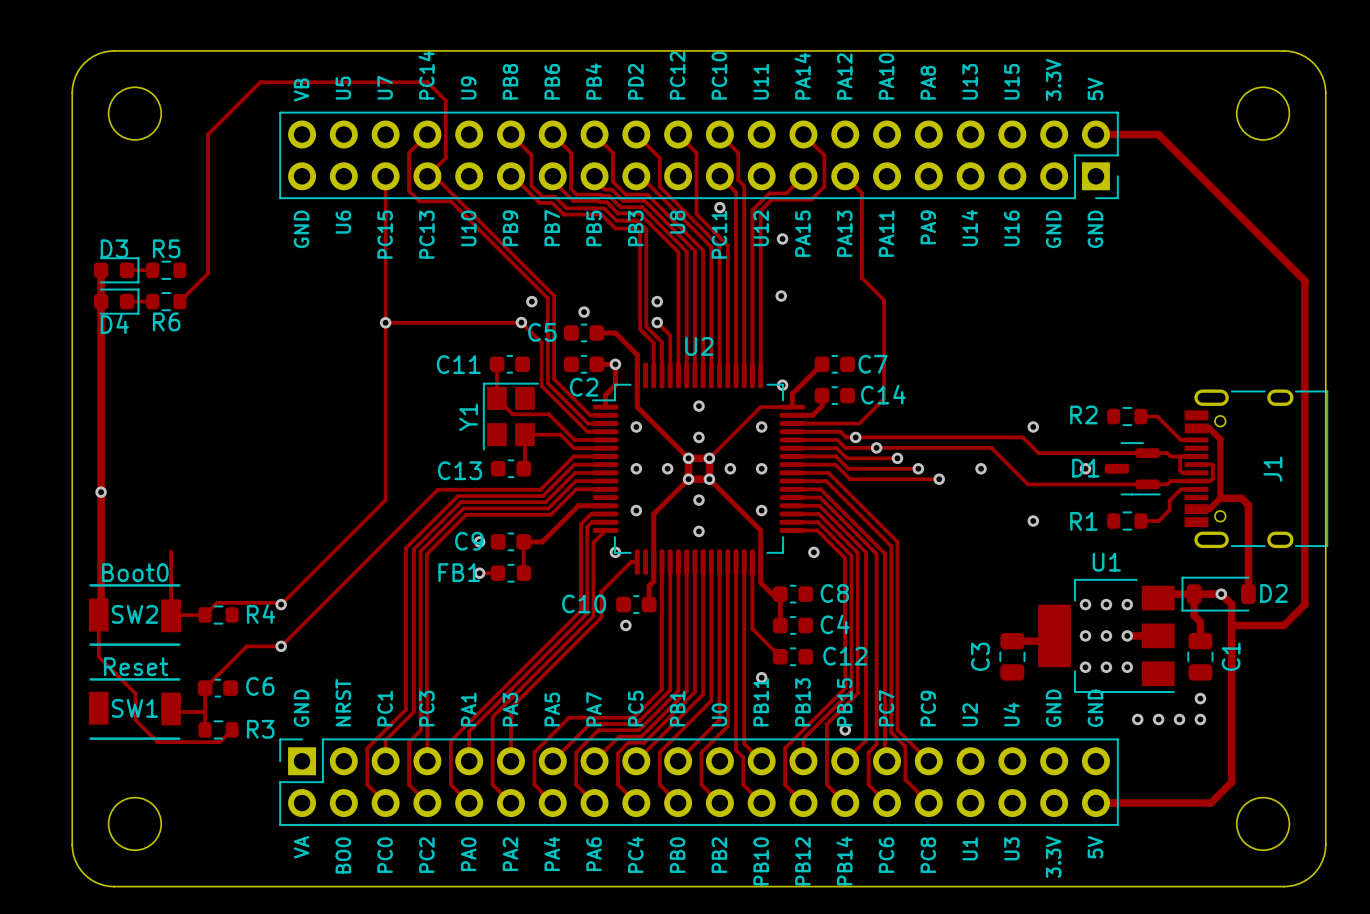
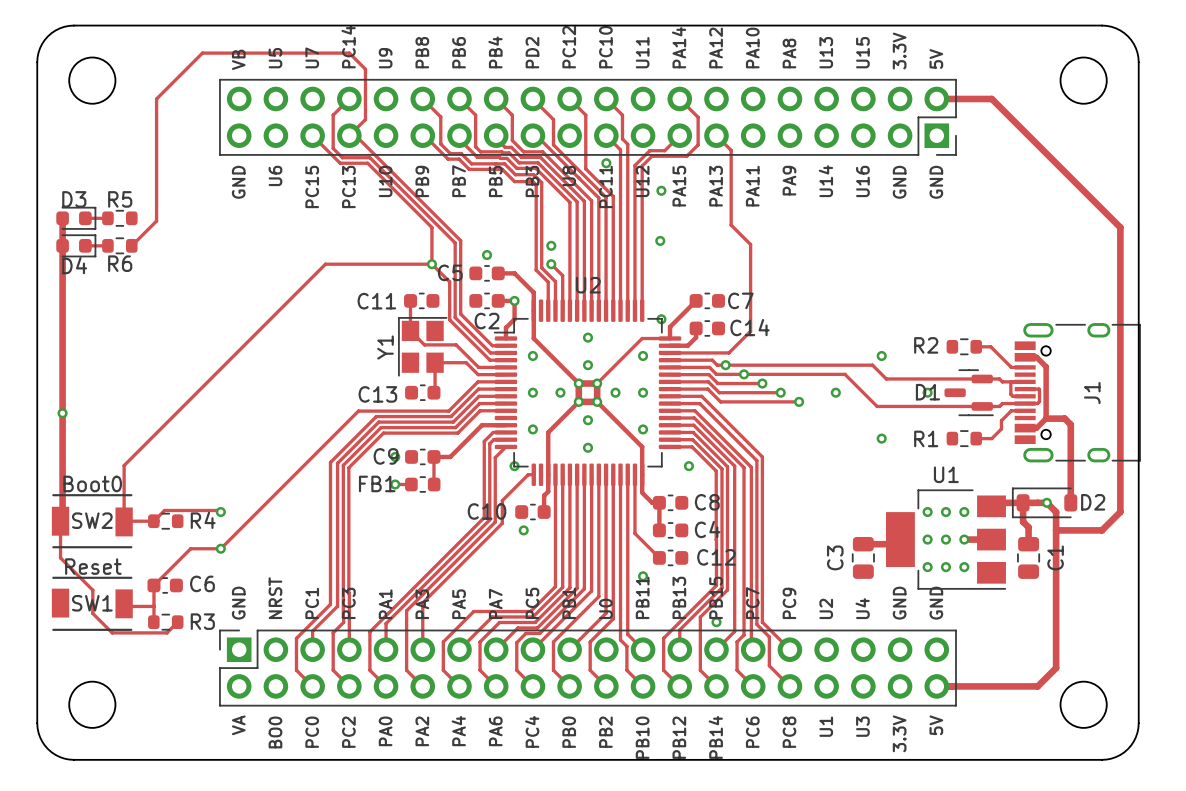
track: (385, 176) (385, 500) (281, 604) -> (312, 135) (340, 163) (367, 163) (431, 227) (431, 264) (325, 264) (124, 465)
via: (531, 301) -> none
via: (385, 322) -> none
track: (521, 322) (385, 322) -> none
via: (1200, 698) -> none
via: (1137, 719) -> none
via: (1158, 719) -> none
via: (1179, 719) -> none
via: (1200, 719) -> none

